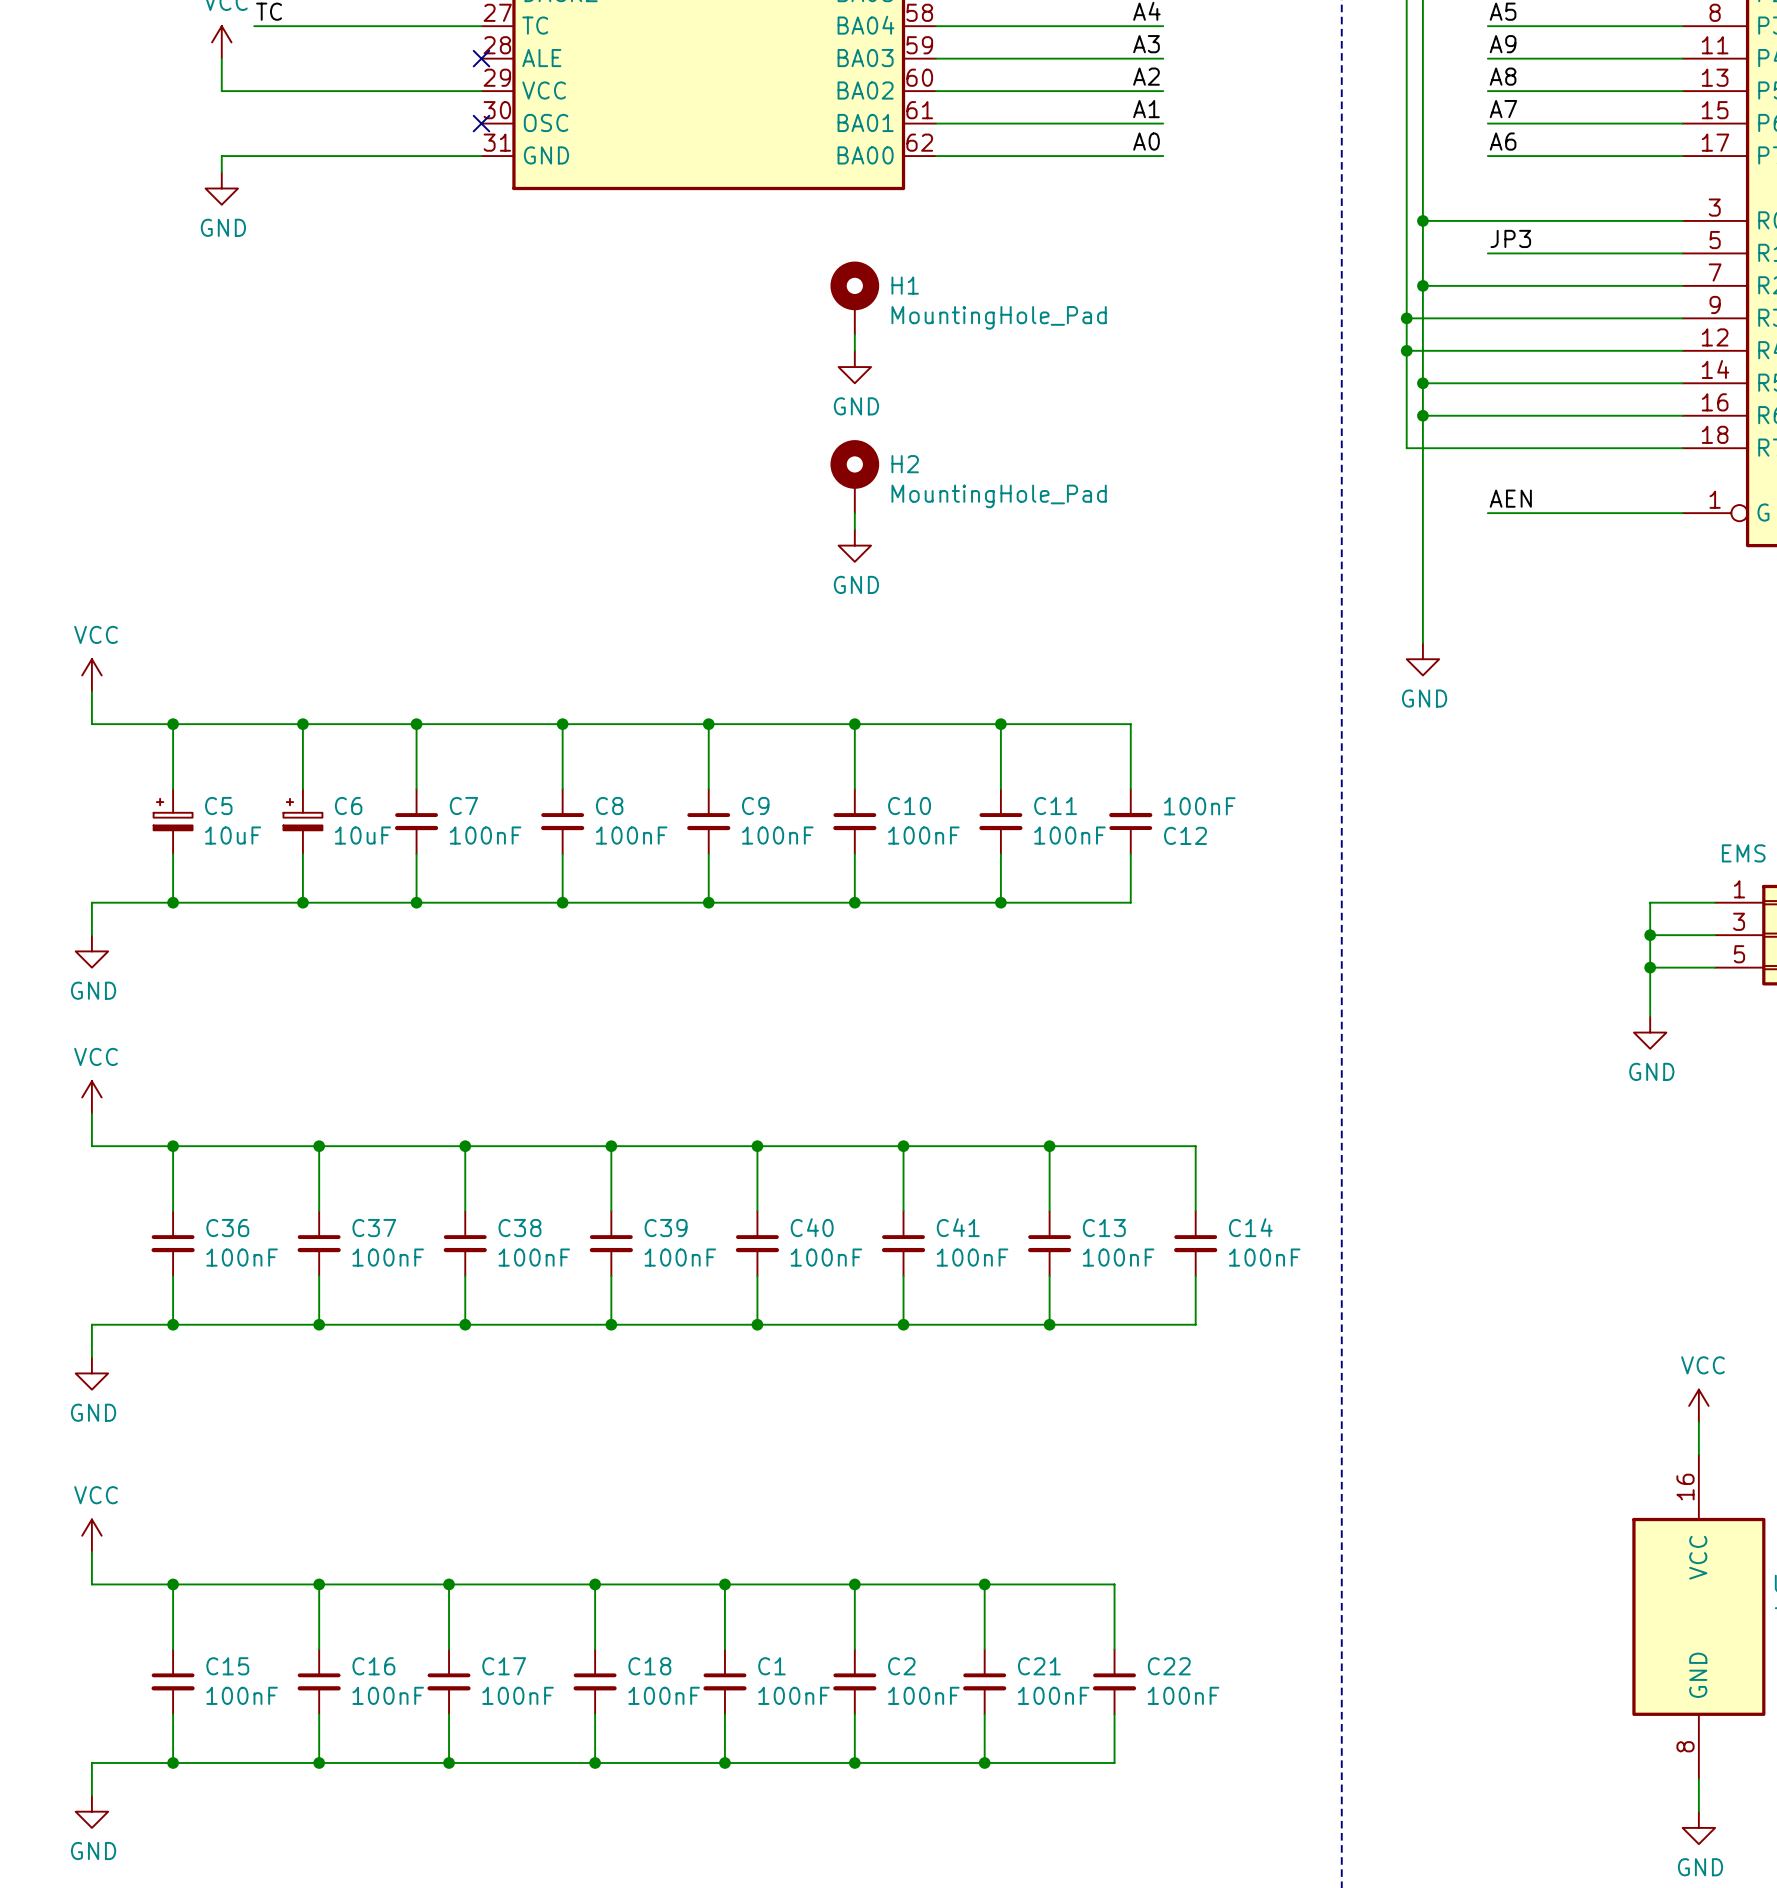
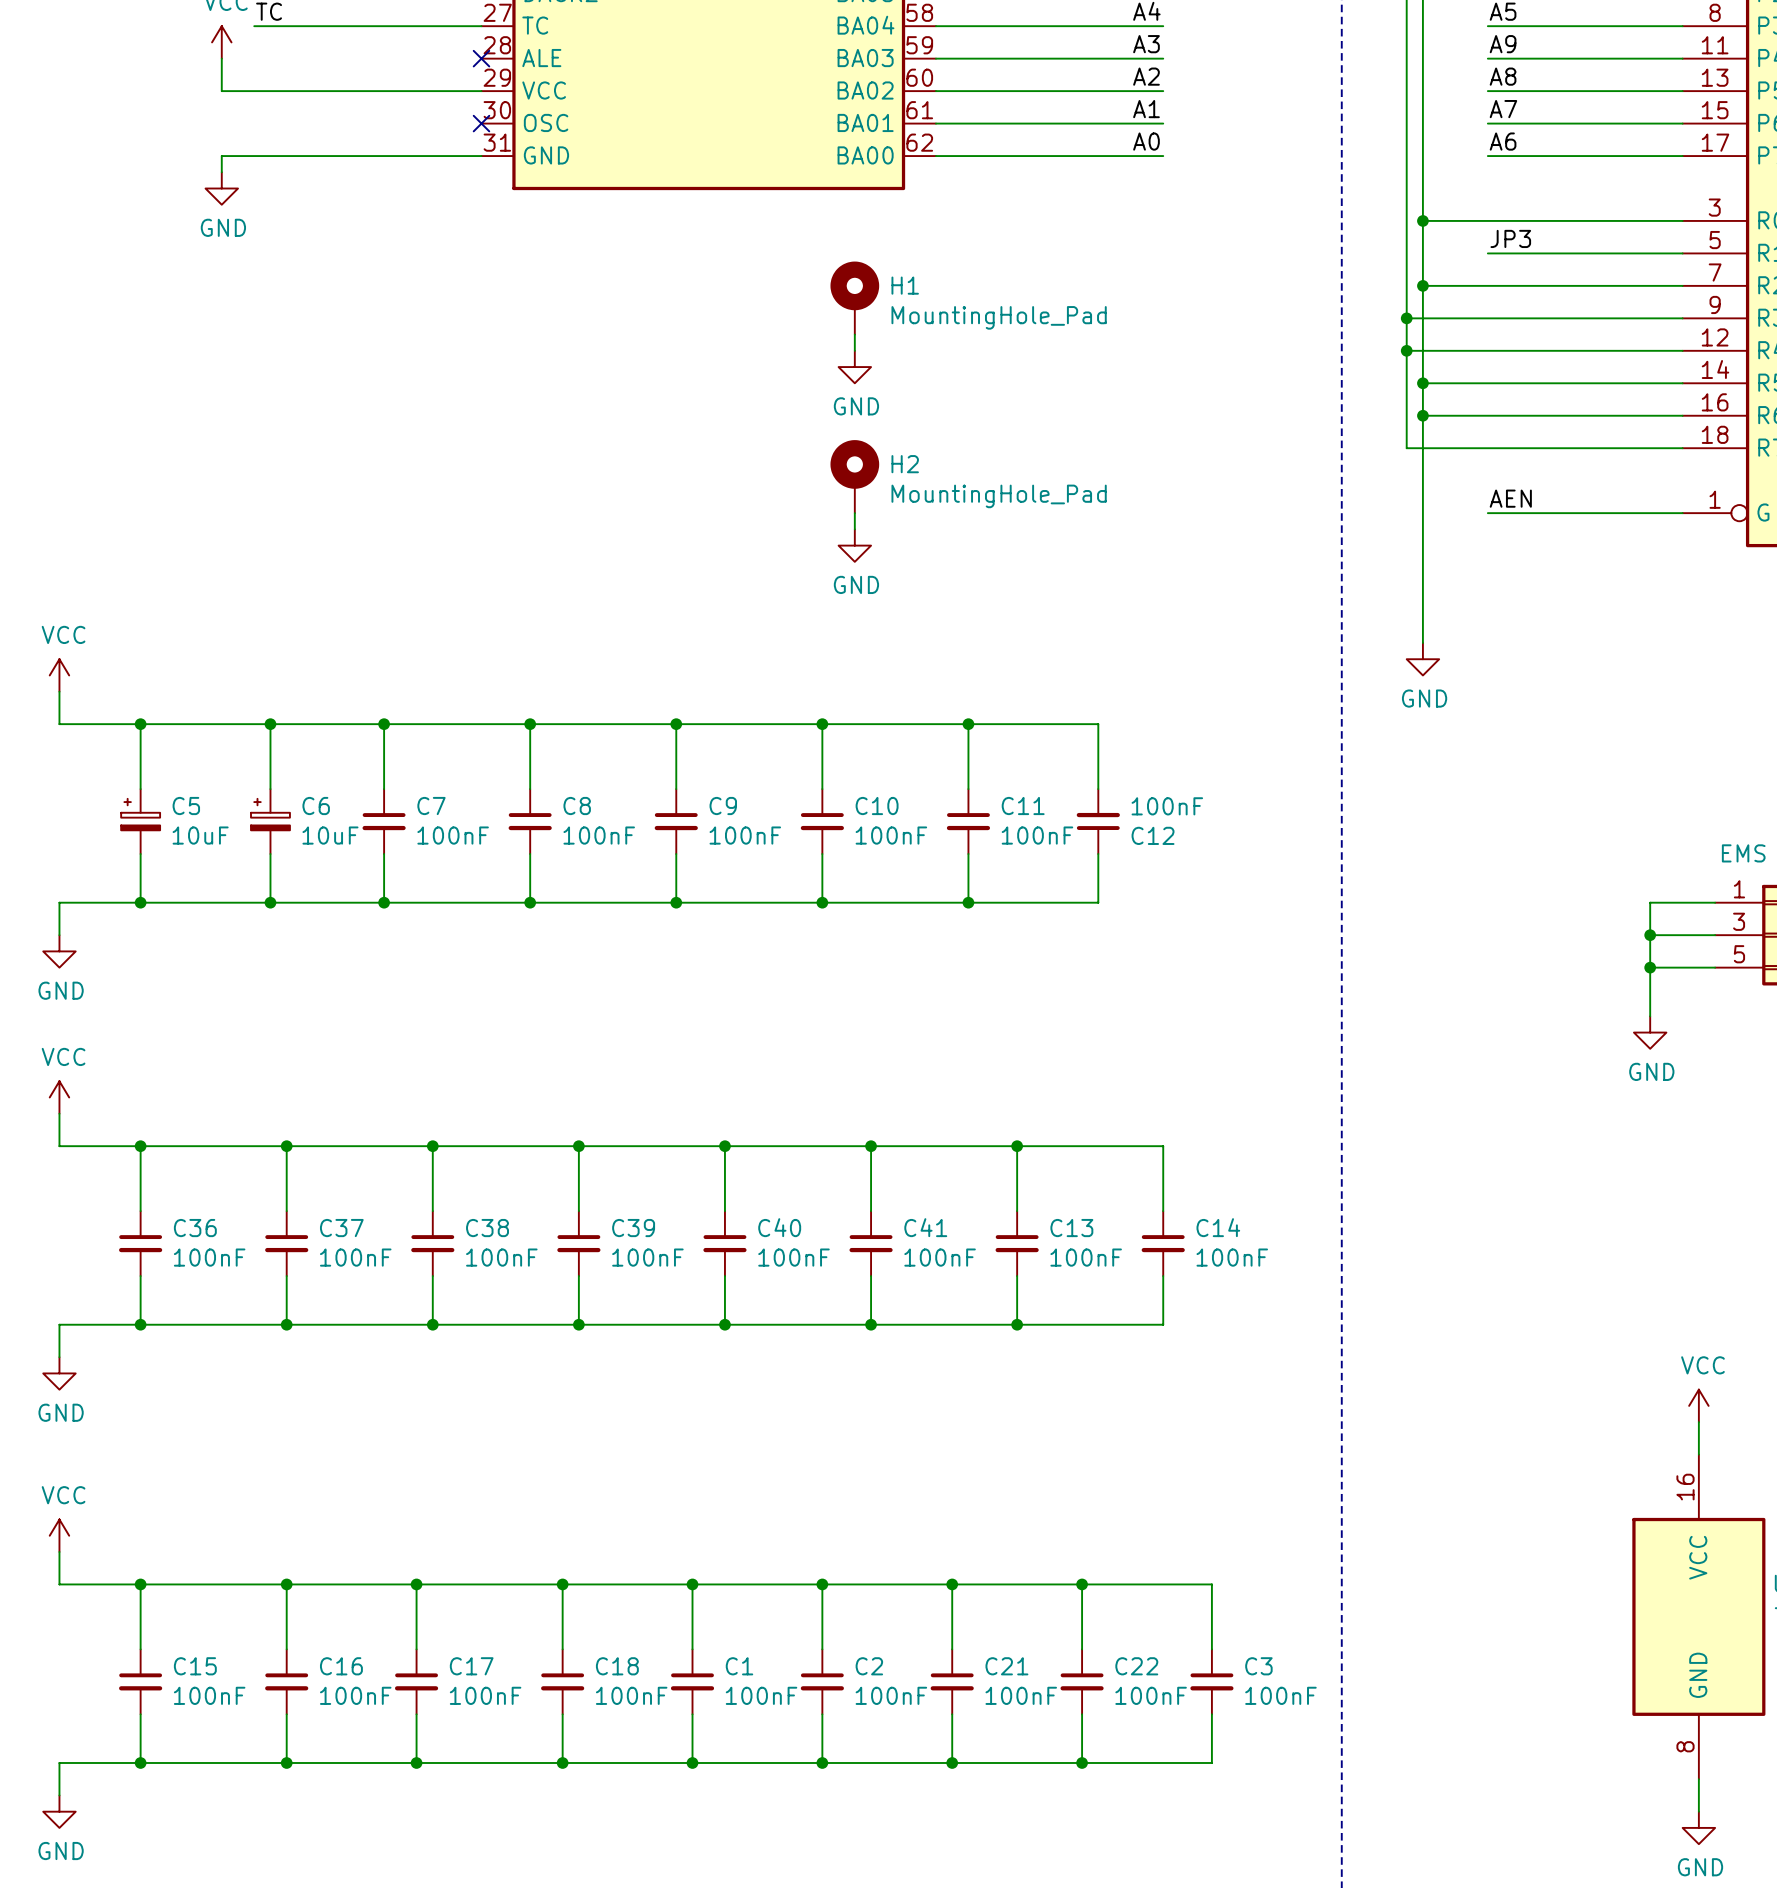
power symbol position: VCC (91, 675) -> VCC (59, 675)
wire: (91, 691) (91, 724) -> (59, 691) (59, 724) (91, 724)
wire: (173, 724) (173, 789) -> (140, 724) (140, 789)
junction position: (173, 724) -> (140, 724)
wire: (302, 724) (302, 789) -> (270, 724) (270, 789)
junction position: (302, 724) -> (270, 724)
wire: (416, 724) (416, 789) -> (384, 724) (384, 789)
junction position: (416, 724) -> (384, 724)
wire: (562, 724) (562, 789) -> (530, 724) (530, 789)
junction position: (562, 724) -> (530, 724)
wire: (708, 724) (708, 789) -> (676, 724) (676, 789)
junction position: (708, 724) -> (676, 724)
wire: (854, 724) (854, 789) -> (822, 724) (822, 789)
junction position: (854, 724) -> (822, 724)
wire: (1000, 724) (1000, 789) -> (968, 724) (968, 789)
junction position: (1000, 724) -> (968, 724)
wire: (1098, 724) (1130, 724) (1130, 789) -> (1098, 724) (1098, 789)
C5 position: (173, 821) -> (140, 821)
C6 position: (302, 821) -> (270, 821)
C7 position: (416, 821) -> (384, 821)
C8 position: (562, 821) -> (530, 821)
C9 position: (708, 821) -> (676, 821)
C10 position: (854, 821) -> (822, 821)
C11 position: (1000, 821) -> (968, 821)
C12 position: (1130, 821) -> (1098, 821)
wire: (173, 854) (173, 902) -> (140, 854) (140, 902)
wire: (302, 854) (302, 902) -> (270, 854) (270, 902)
wire: (416, 854) (416, 902) -> (384, 854) (384, 902)
wire: (562, 854) (562, 902) -> (530, 854) (530, 902)
wire: (708, 854) (708, 902) -> (676, 854) (676, 902)
wire: (854, 854) (854, 902) -> (822, 854) (822, 902)
wire: (1000, 854) (1000, 902) -> (968, 854) (968, 902)
wire: (1130, 854) (1130, 902) (1098, 902) -> (1098, 854) (1098, 902)
wire: (91, 902) (91, 935) -> (91, 902) (59, 902) (59, 935)
junction position: (173, 902) -> (140, 902)
junction position: (302, 902) -> (270, 902)
junction position: (416, 902) -> (384, 902)
junction position: (562, 902) -> (530, 902)
junction position: (708, 902) -> (676, 902)
junction position: (854, 902) -> (822, 902)
junction position: (1000, 902) -> (968, 902)
power symbol position: GND (91, 951) -> GND (59, 951)
power symbol position: VCC (91, 1097) -> VCC (59, 1097)
wire: (91, 1113) (91, 1146) -> (59, 1113) (59, 1146) (91, 1146)
wire: (173, 1146) (173, 1211) -> (140, 1146) (140, 1211)
junction position: (173, 1146) -> (140, 1146)
wire: (319, 1146) (319, 1211) -> (286, 1146) (286, 1211)
junction position: (319, 1146) -> (286, 1146)
wire: (465, 1146) (465, 1211) -> (432, 1146) (432, 1211)
junction position: (465, 1146) -> (432, 1146)
wire: (611, 1146) (611, 1211) -> (578, 1146) (578, 1211)
junction position: (611, 1146) -> (578, 1146)
wire: (757, 1146) (757, 1211) -> (724, 1146) (724, 1211)
junction position: (757, 1146) -> (724, 1146)
wire: (903, 1146) (903, 1211) -> (871, 1146) (871, 1211)
junction position: (903, 1146) -> (871, 1146)
wire: (1049, 1146) (1049, 1211) -> (1017, 1146) (1017, 1211)
junction position: (1049, 1146) -> (1017, 1146)
wire: (1163, 1146) (1195, 1146) (1195, 1211) -> (1163, 1146) (1163, 1211)
C36 position: (173, 1243) -> (140, 1243)
C37 position: (319, 1243) -> (286, 1243)
C38 position: (465, 1243) -> (432, 1243)
C39 position: (611, 1243) -> (578, 1243)
C40 position: (757, 1243) -> (724, 1243)
C41 position: (903, 1243) -> (871, 1243)
C13 position: (1049, 1243) -> (1017, 1243)
C14 position: (1195, 1243) -> (1163, 1243)
wire: (173, 1276) (173, 1324) -> (140, 1276) (140, 1324)
wire: (319, 1276) (319, 1324) -> (286, 1276) (286, 1324)
wire: (465, 1276) (465, 1324) -> (432, 1276) (432, 1324)
wire: (611, 1276) (611, 1324) -> (578, 1276) (578, 1324)
wire: (757, 1276) (757, 1324) -> (724, 1276) (724, 1324)
wire: (903, 1276) (903, 1324) -> (871, 1276) (871, 1324)
wire: (1049, 1276) (1049, 1324) -> (1017, 1276) (1017, 1324)
wire: (1195, 1276) (1195, 1324) (1163, 1324) -> (1163, 1276) (1163, 1324)
wire: (91, 1324) (91, 1357) -> (91, 1324) (59, 1324) (59, 1357)
junction position: (173, 1324) -> (140, 1324)
junction position: (319, 1324) -> (286, 1324)
junction position: (465, 1324) -> (432, 1324)
junction position: (611, 1324) -> (578, 1324)
junction position: (757, 1324) -> (724, 1324)
junction position: (903, 1324) -> (871, 1324)
junction position: (1049, 1324) -> (1017, 1324)
power symbol position: GND (91, 1373) -> GND (59, 1373)
power symbol position: VCC (91, 1535) -> VCC (59, 1535)
wire: (91, 1551) (91, 1584) -> (59, 1551) (59, 1584) (91, 1584)
wire: (173, 1584) (173, 1649) -> (140, 1584) (140, 1649)
junction position: (173, 1584) -> (140, 1584)
wire: (319, 1584) (319, 1649) -> (286, 1584) (286, 1649)
junction position: (319, 1584) -> (286, 1584)
wire: (449, 1584) (449, 1649) -> (416, 1584) (416, 1649)
junction position: (449, 1584) -> (416, 1584)
wire: (595, 1584) (595, 1649) -> (562, 1584) (562, 1649)
junction position: (595, 1584) -> (562, 1584)
wire: (724, 1584) (724, 1649) -> (692, 1584) (692, 1649)
junction position: (724, 1584) -> (692, 1584)
wire: (854, 1584) (854, 1649) -> (822, 1584) (822, 1649)
junction position: (854, 1584) -> (822, 1584)
wire: (984, 1584) (984, 1649) -> (952, 1584) (952, 1649)
junction position: (984, 1584) -> (952, 1584)
wire: none -> (1082, 1584) (1082, 1649)
junction: none -> (1082, 1584)
wire: (1114, 1584) (1114, 1649) -> (1114, 1584) (1211, 1584) (1211, 1649)
C15 position: (173, 1681) -> (140, 1681)
C16 position: (319, 1681) -> (286, 1681)
C17 position: (449, 1681) -> (416, 1681)
C18 position: (595, 1681) -> (562, 1681)
C1 position: (724, 1681) -> (692, 1681)
C2 position: (854, 1681) -> (822, 1681)
C21 position: (984, 1681) -> (952, 1681)
C22 position: (1114, 1681) -> (1082, 1681)
C3: none -> 100nF (1211, 1681)
wire: (173, 1714) (173, 1762) -> (140, 1714) (140, 1762)
wire: (319, 1714) (319, 1762) -> (286, 1714) (286, 1762)
wire: (449, 1714) (449, 1762) -> (416, 1714) (416, 1762)
wire: (595, 1714) (595, 1762) -> (562, 1714) (562, 1762)
wire: (724, 1714) (724, 1762) -> (692, 1714) (692, 1762)
wire: (854, 1714) (854, 1762) -> (822, 1714) (822, 1762)
wire: (984, 1714) (984, 1762) -> (952, 1714) (952, 1762)
wire: none -> (1082, 1714) (1082, 1762)
wire: (1114, 1714) (1114, 1762) -> (1211, 1714) (1211, 1762) (1114, 1762)
wire: (91, 1762) (91, 1795) -> (91, 1762) (59, 1762) (59, 1795)
junction position: (173, 1762) -> (140, 1762)
junction position: (319, 1762) -> (286, 1762)
junction position: (449, 1762) -> (416, 1762)
junction position: (595, 1762) -> (562, 1762)
junction position: (724, 1762) -> (692, 1762)
junction position: (854, 1762) -> (822, 1762)
junction position: (984, 1762) -> (952, 1762)
junction: none -> (1082, 1762)
power symbol position: GND (91, 1811) -> GND (59, 1811)

